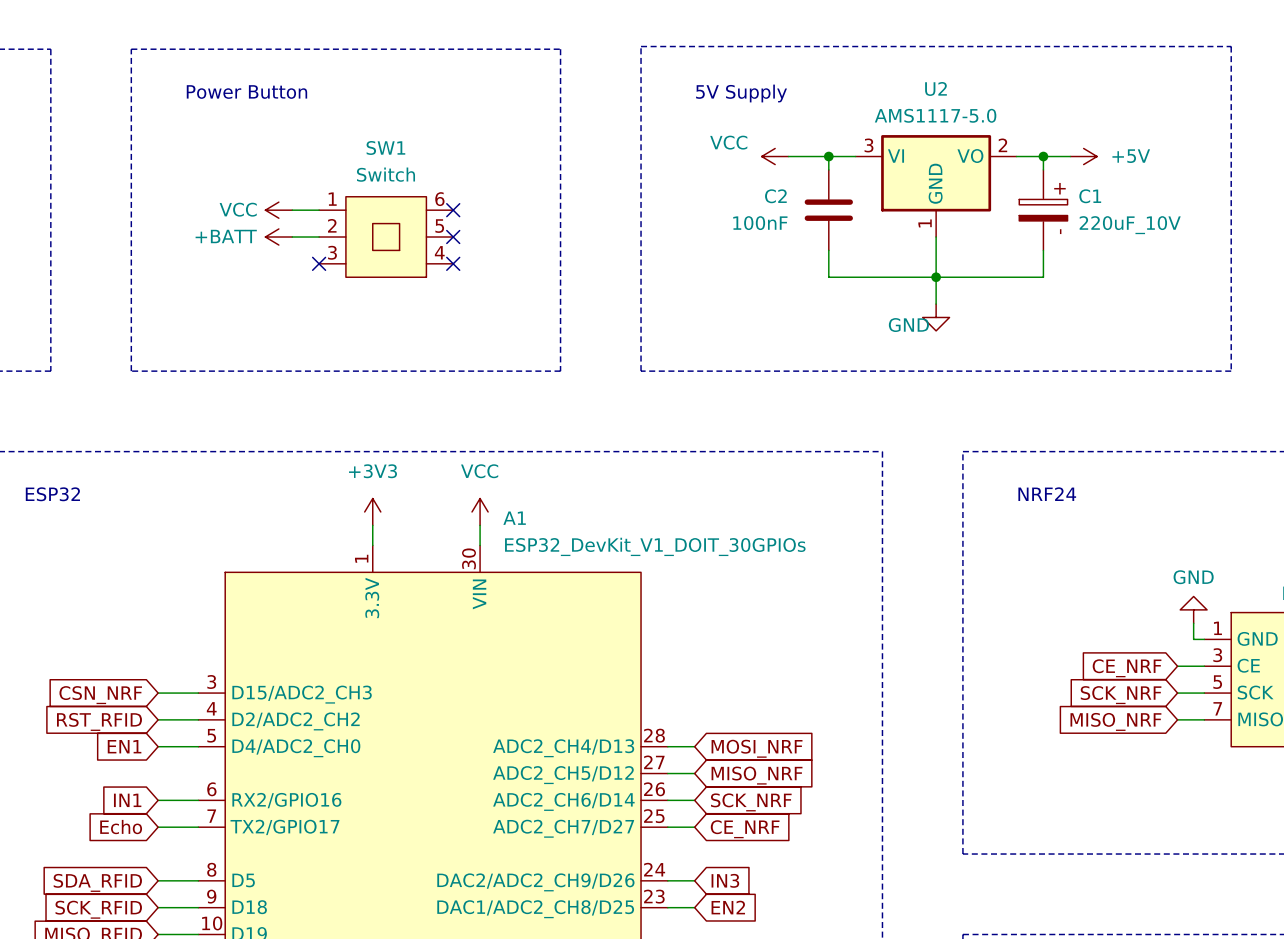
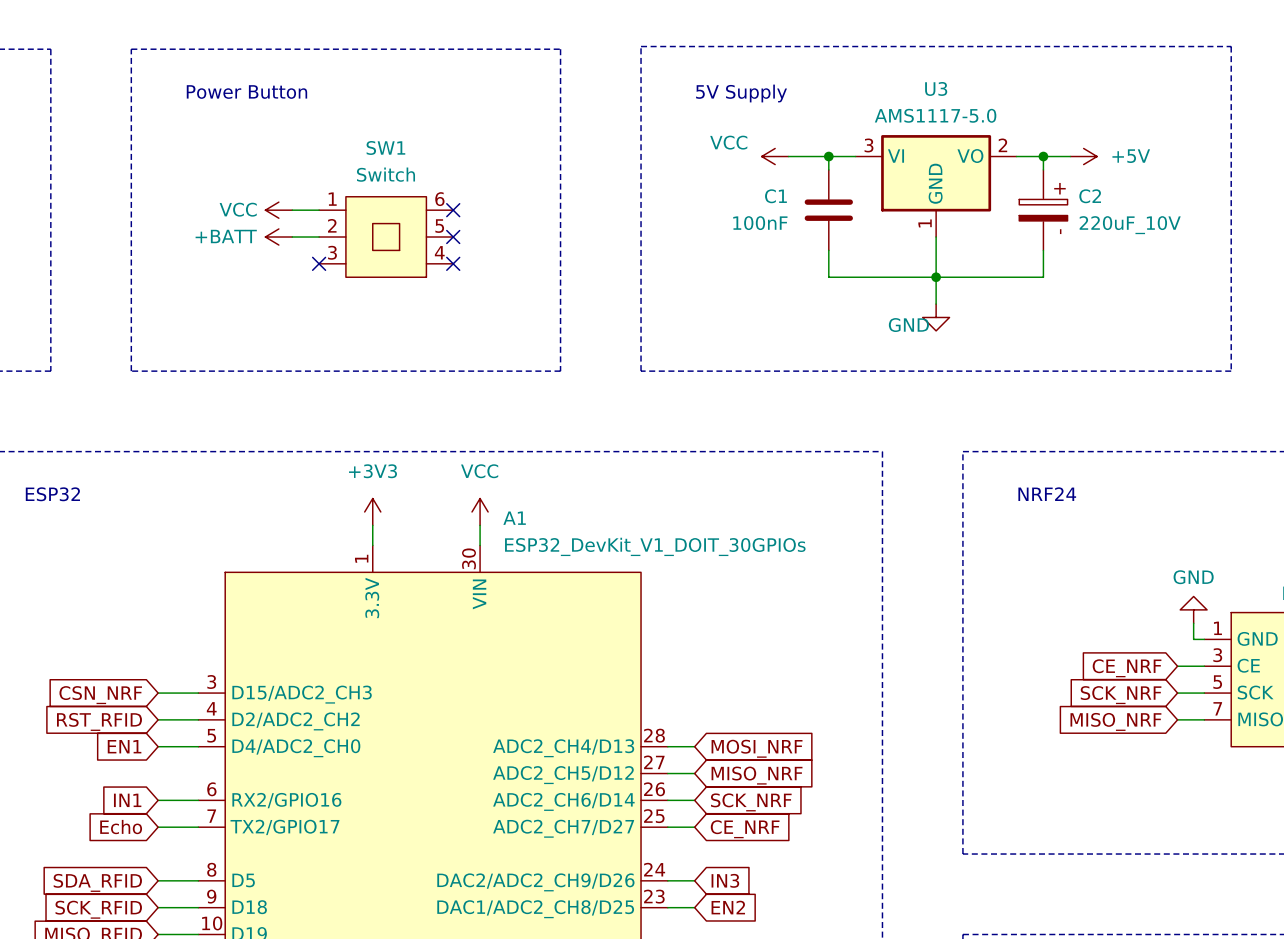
U2 name: U2 (935, 88) -> U3 (936, 88)
C2 name: C2 (775, 196) -> C1 (775, 196)
C1 name: C1 (1090, 196) -> C2 (1090, 196)

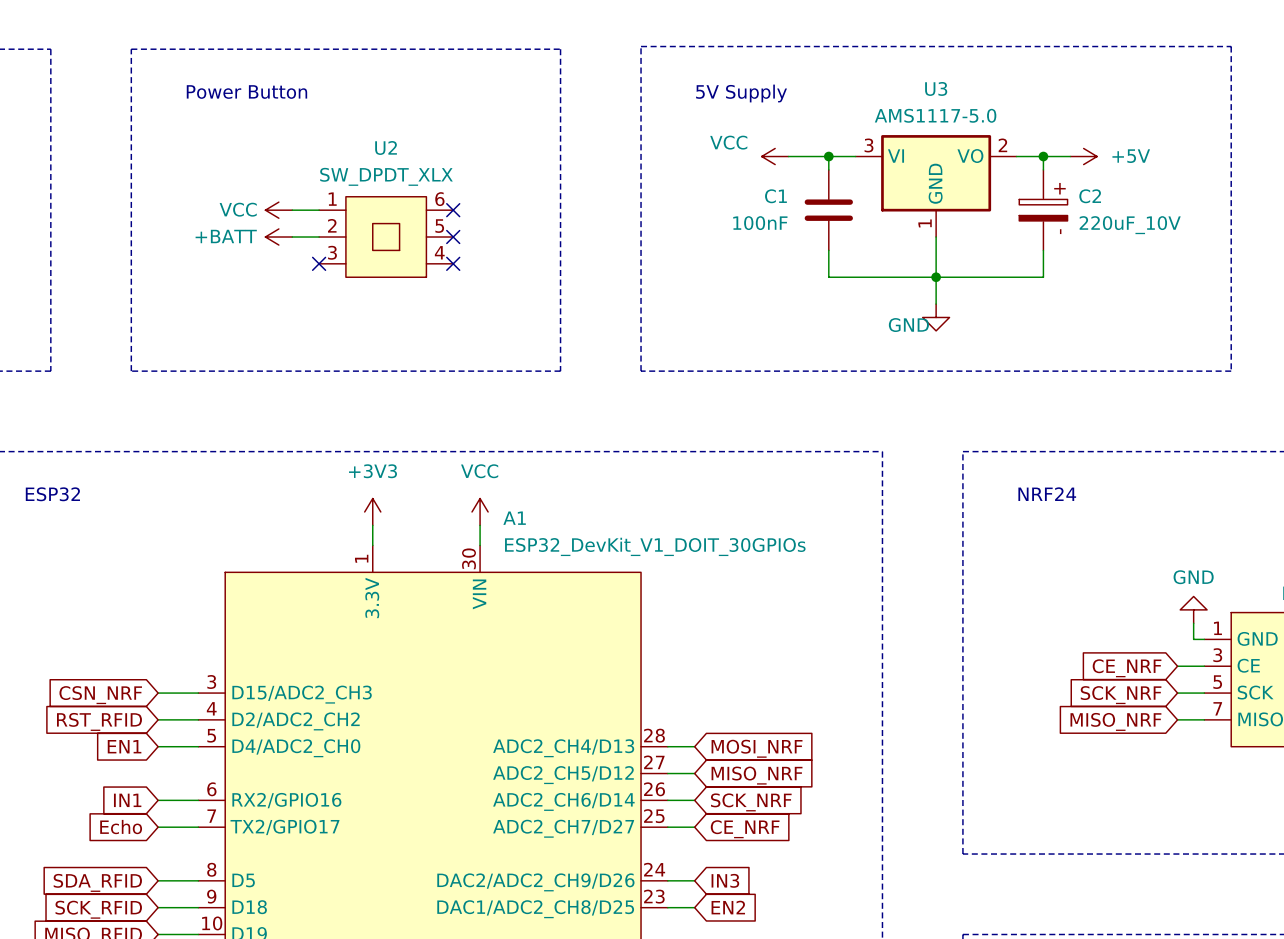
SW1 name: SW1 (385, 147) -> U2 (386, 147)
SW1 value: Switch (385, 174) -> SW_DPDT_XLX (386, 176)

